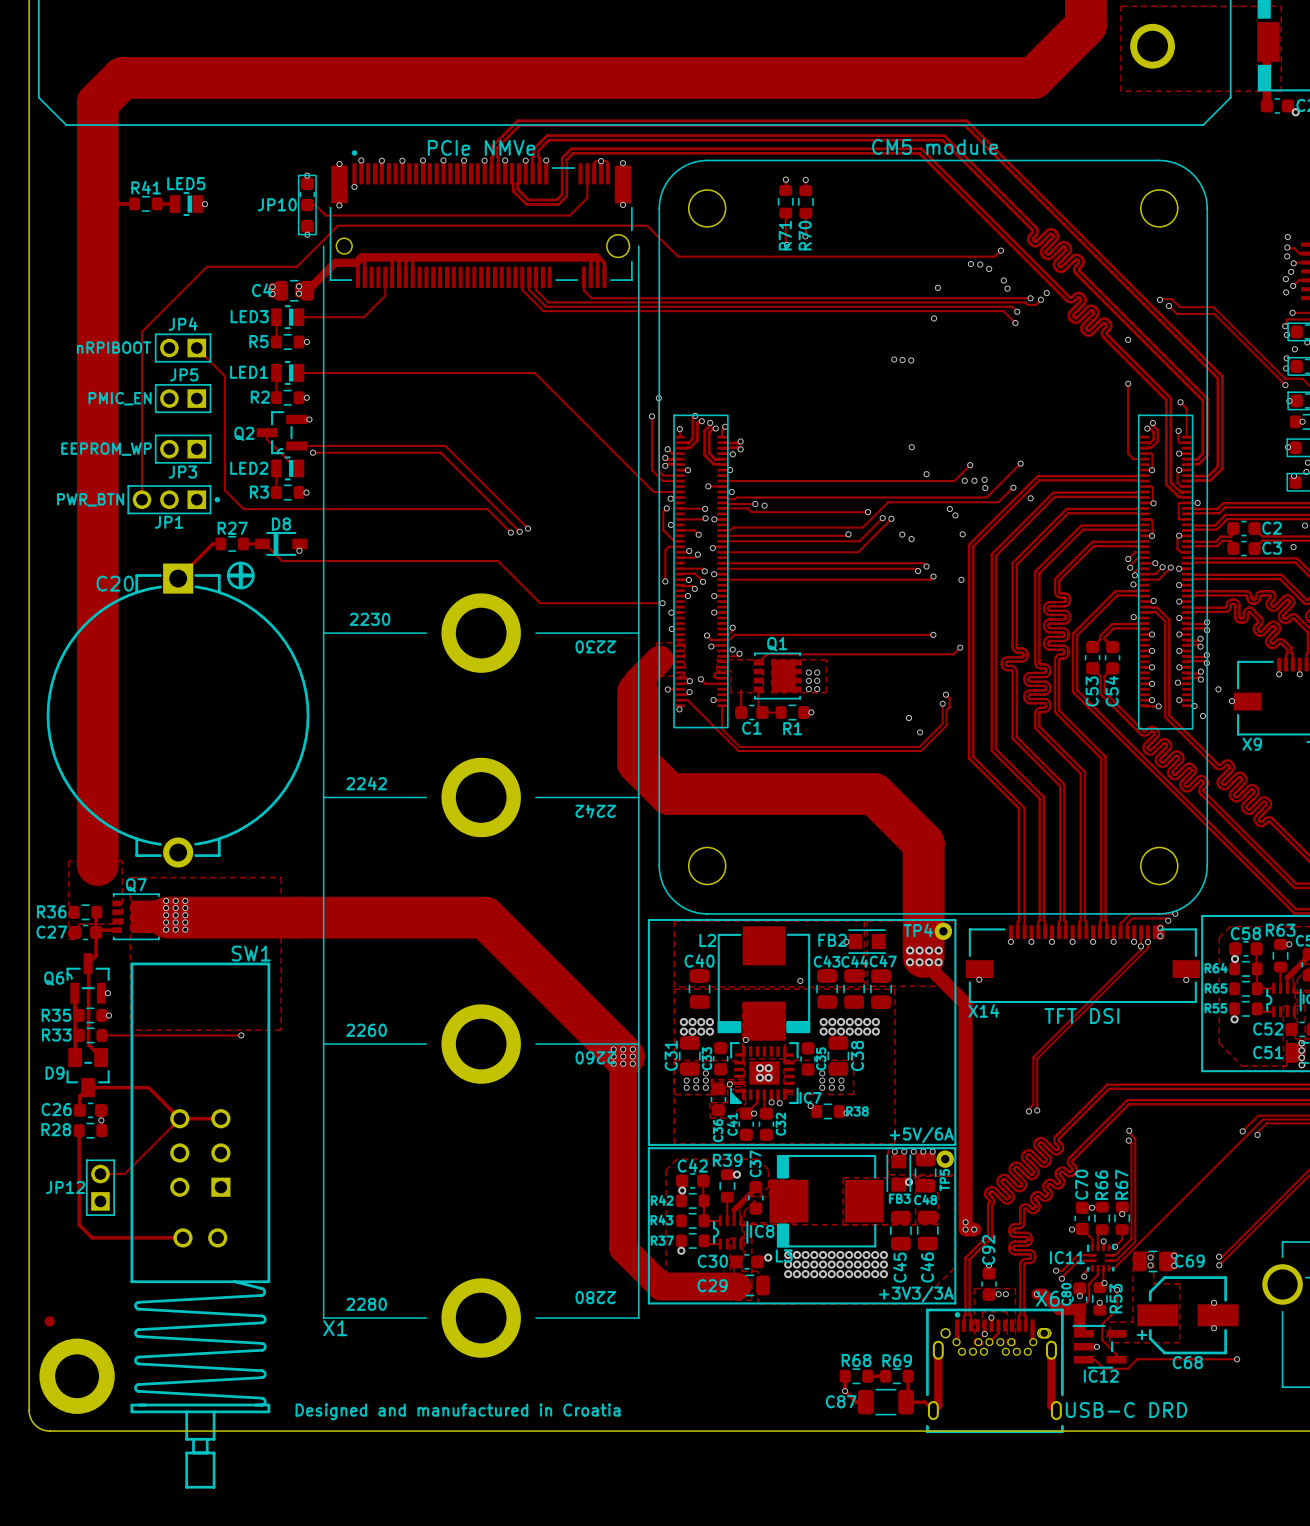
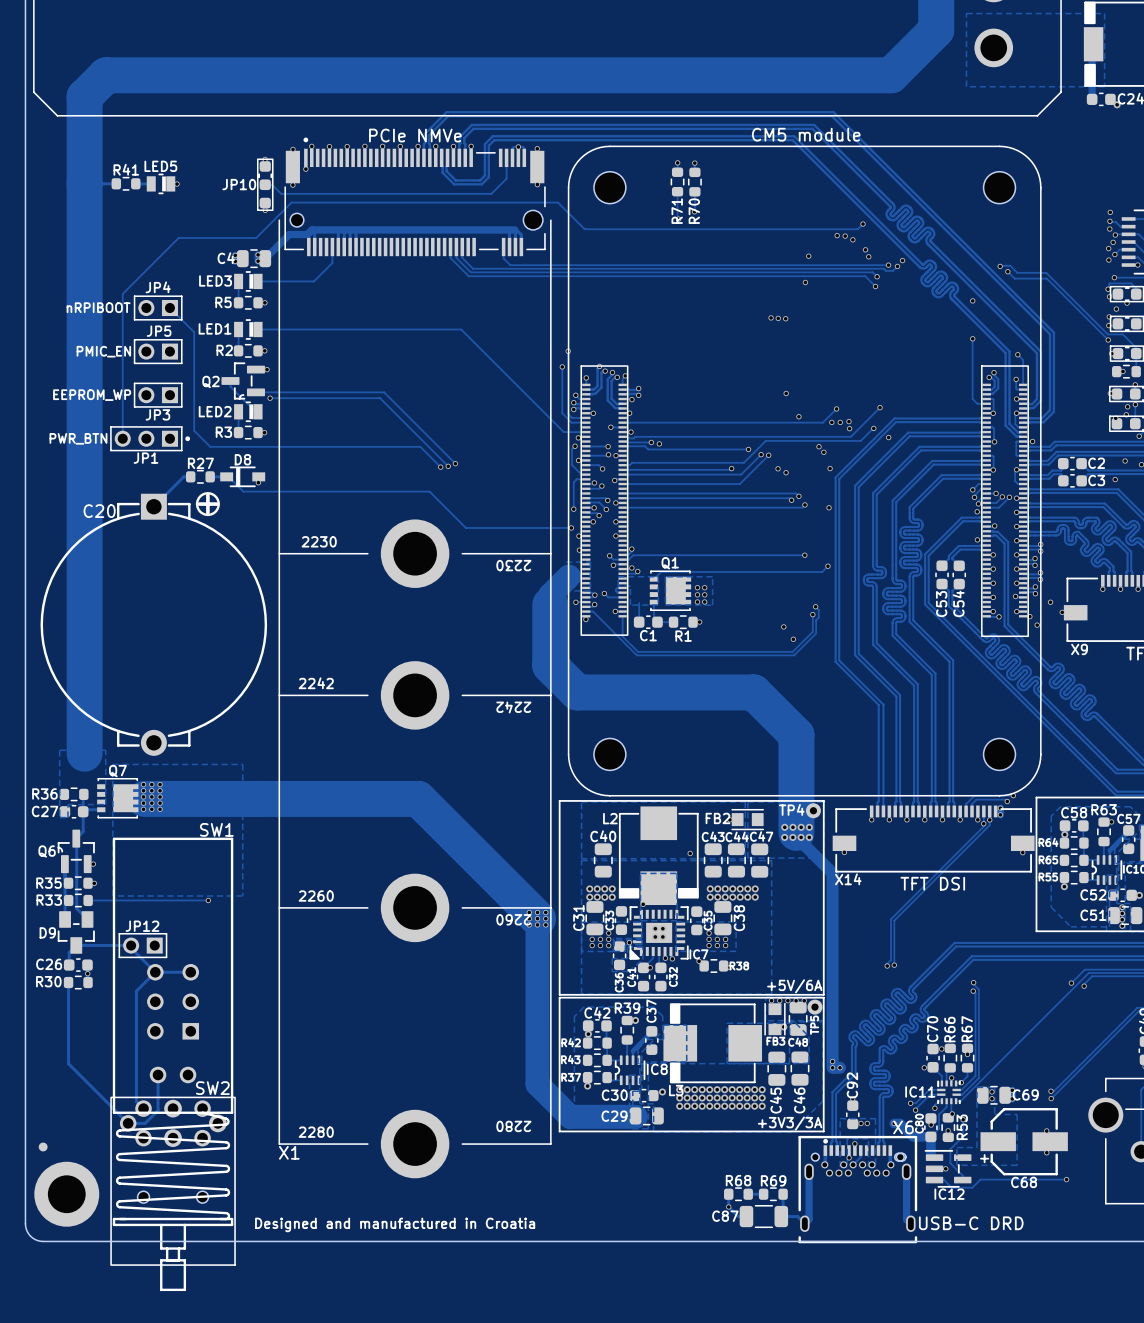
track: (179, 1118) (124, 1174) (100, 1174) -> (155, 972) (136, 991) (136, 1101) (142, 1109)
R28 name: R28 (56, 1129) -> R30 (48, 981)
JP12 name position: JP12 (65, 1187) -> JP12 (142, 926)
JP12 rotation: 0° (100, 1187) -> 90° counterclockwise (142, 945)
JP12 position: (100, 1187) -> (142, 945)
track: (92, 1237) (182, 1237) -> (79, 1074) (128, 1123)
track: none -> (158, 1074) (158, 1110) (145, 1123) (128, 1123)
SW2: none -> (173, 1181)

